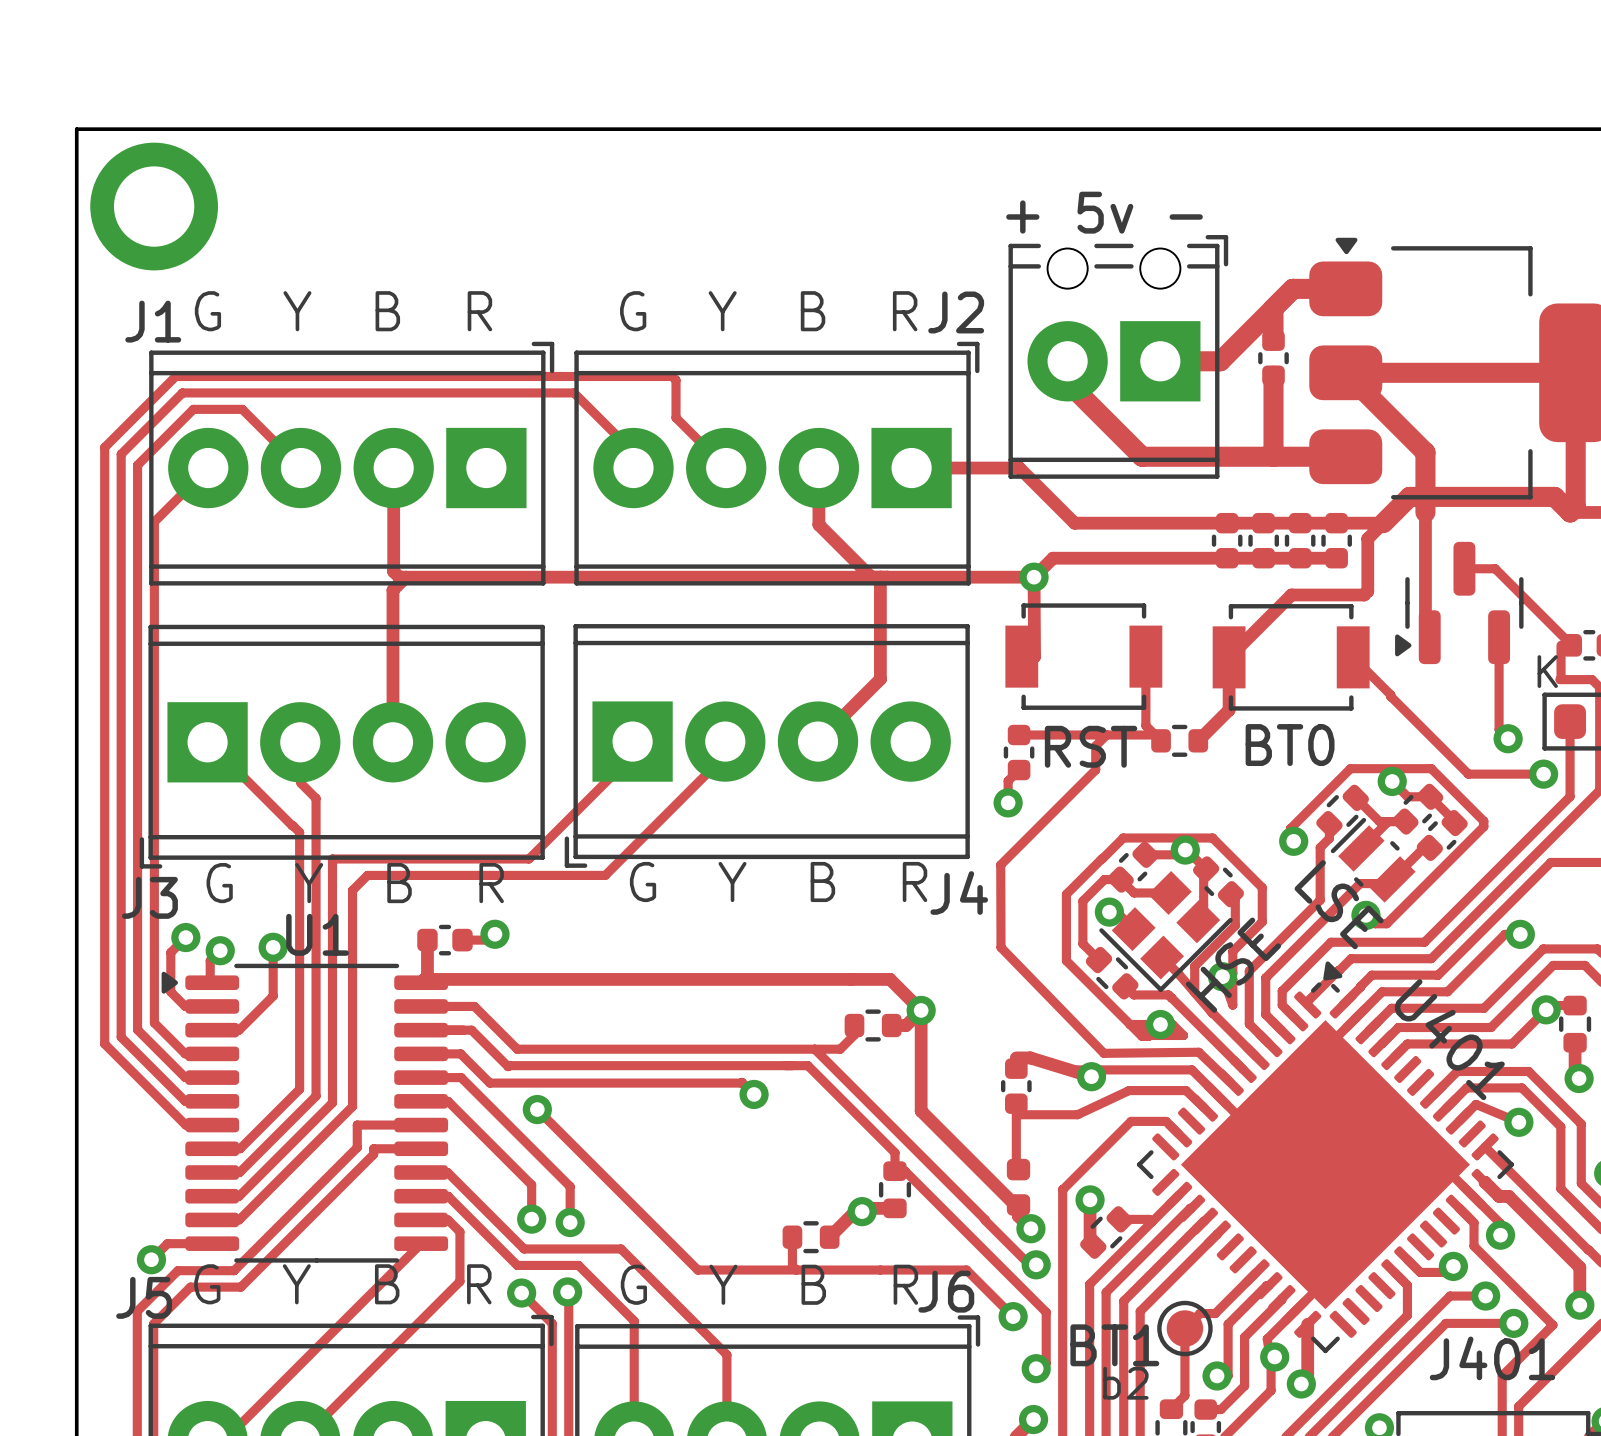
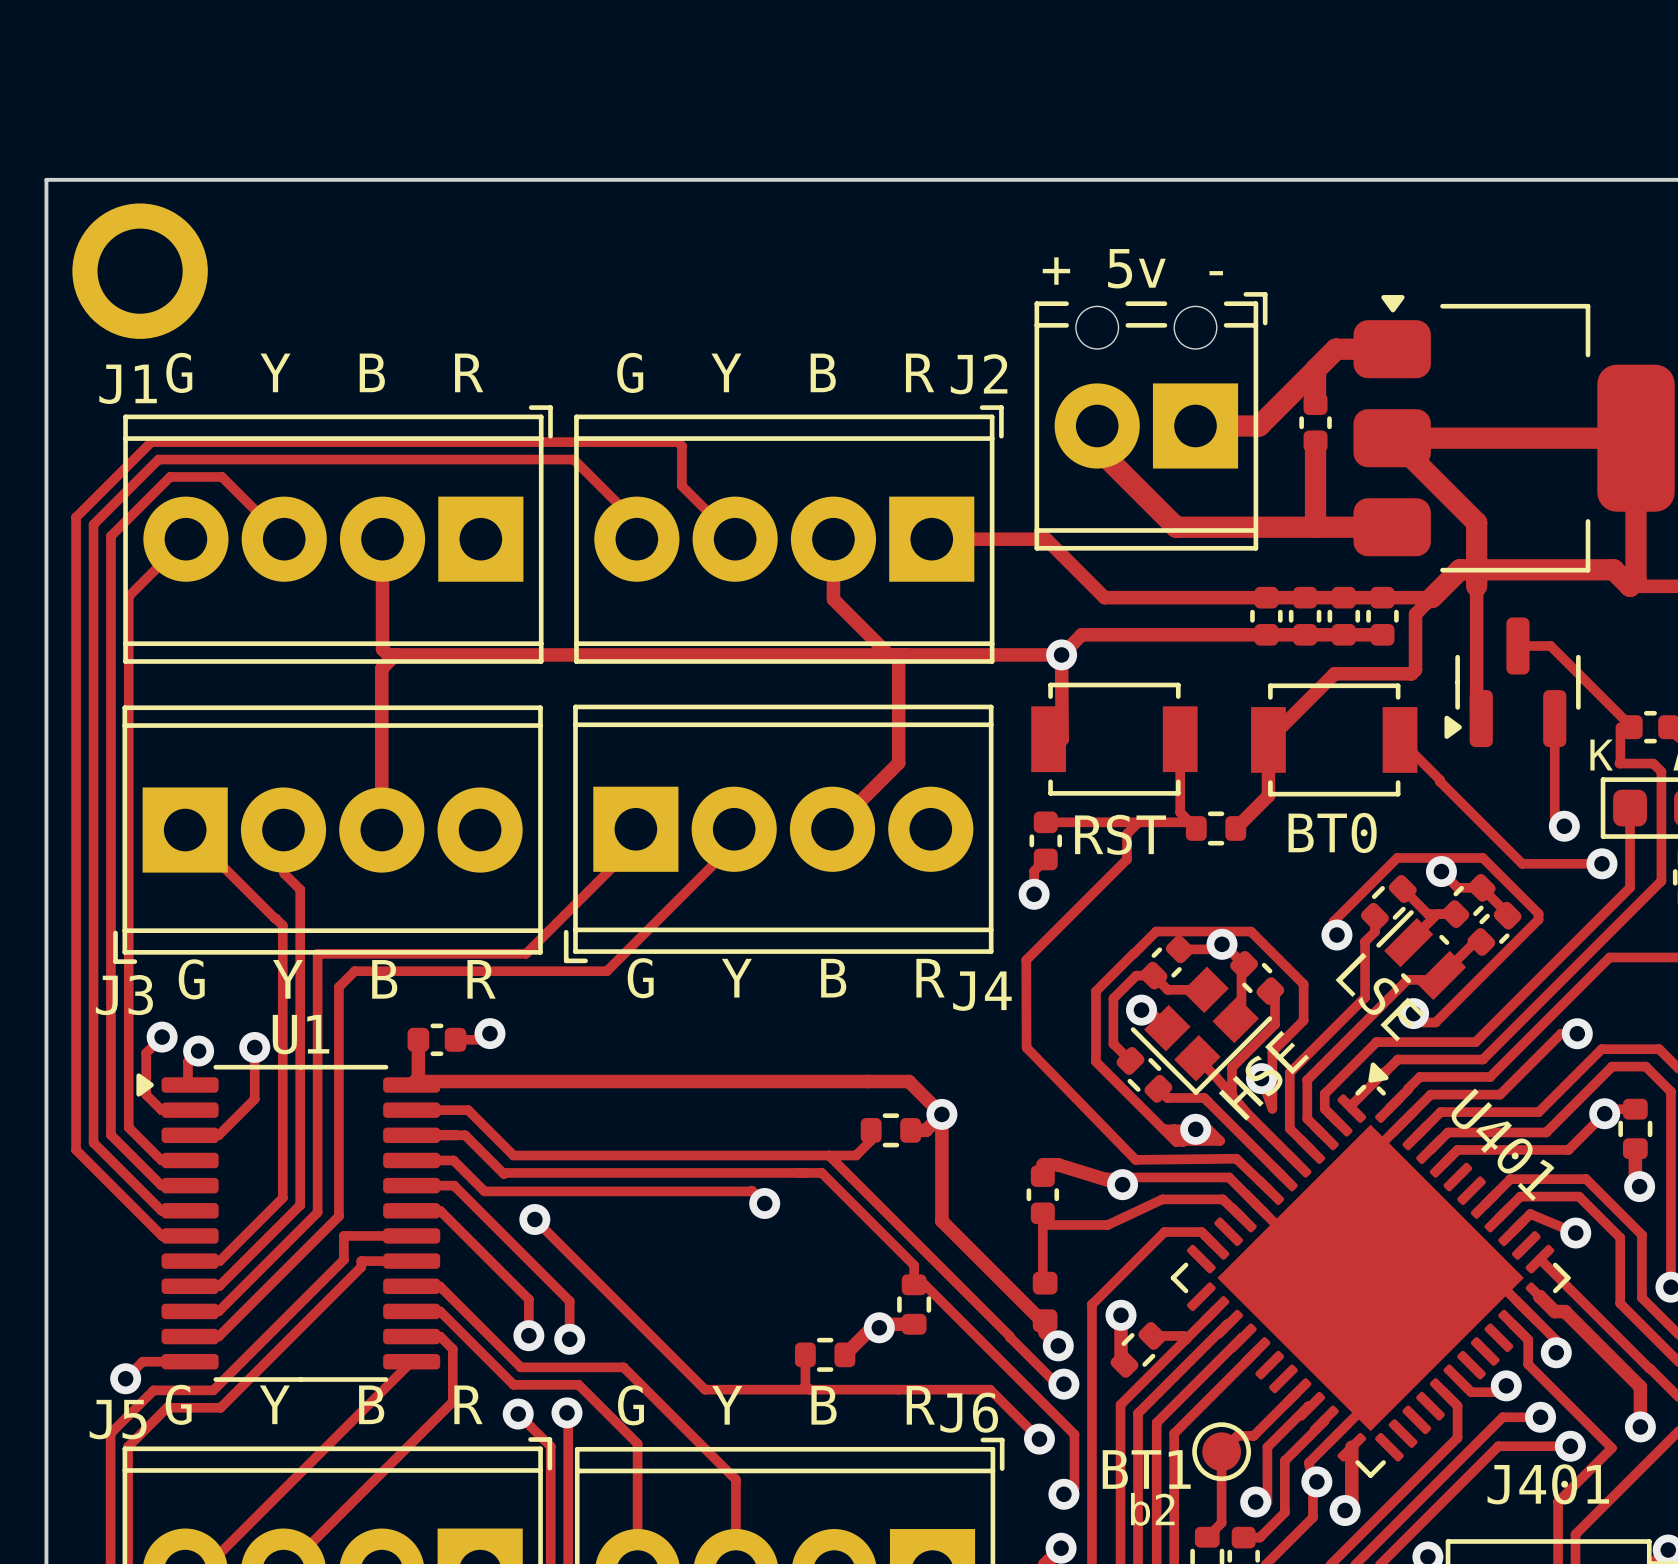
part position: (154, 206) -> (140, 271)

